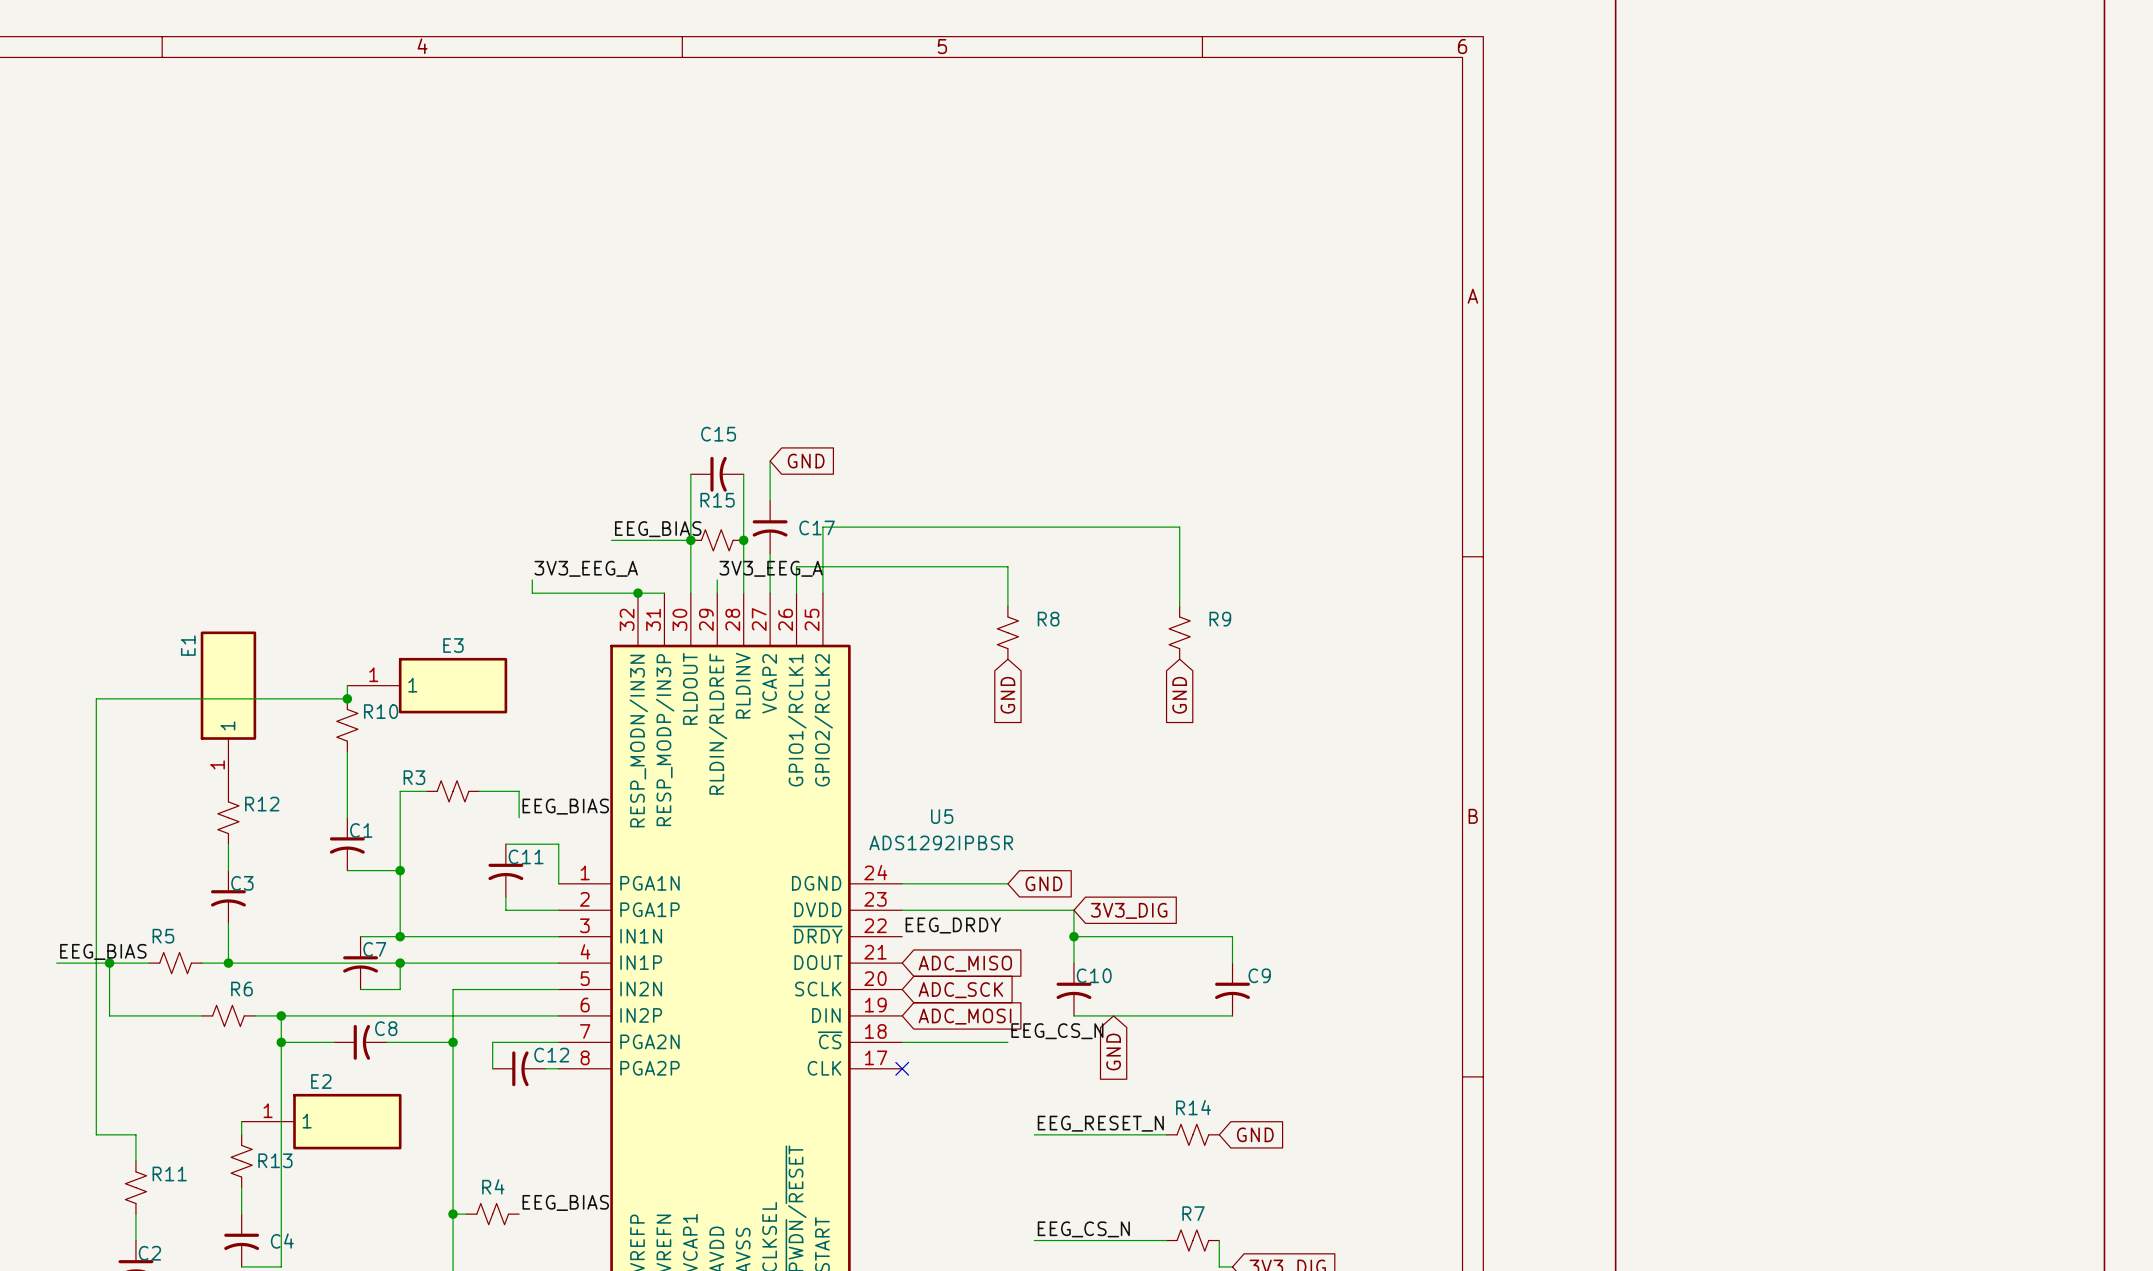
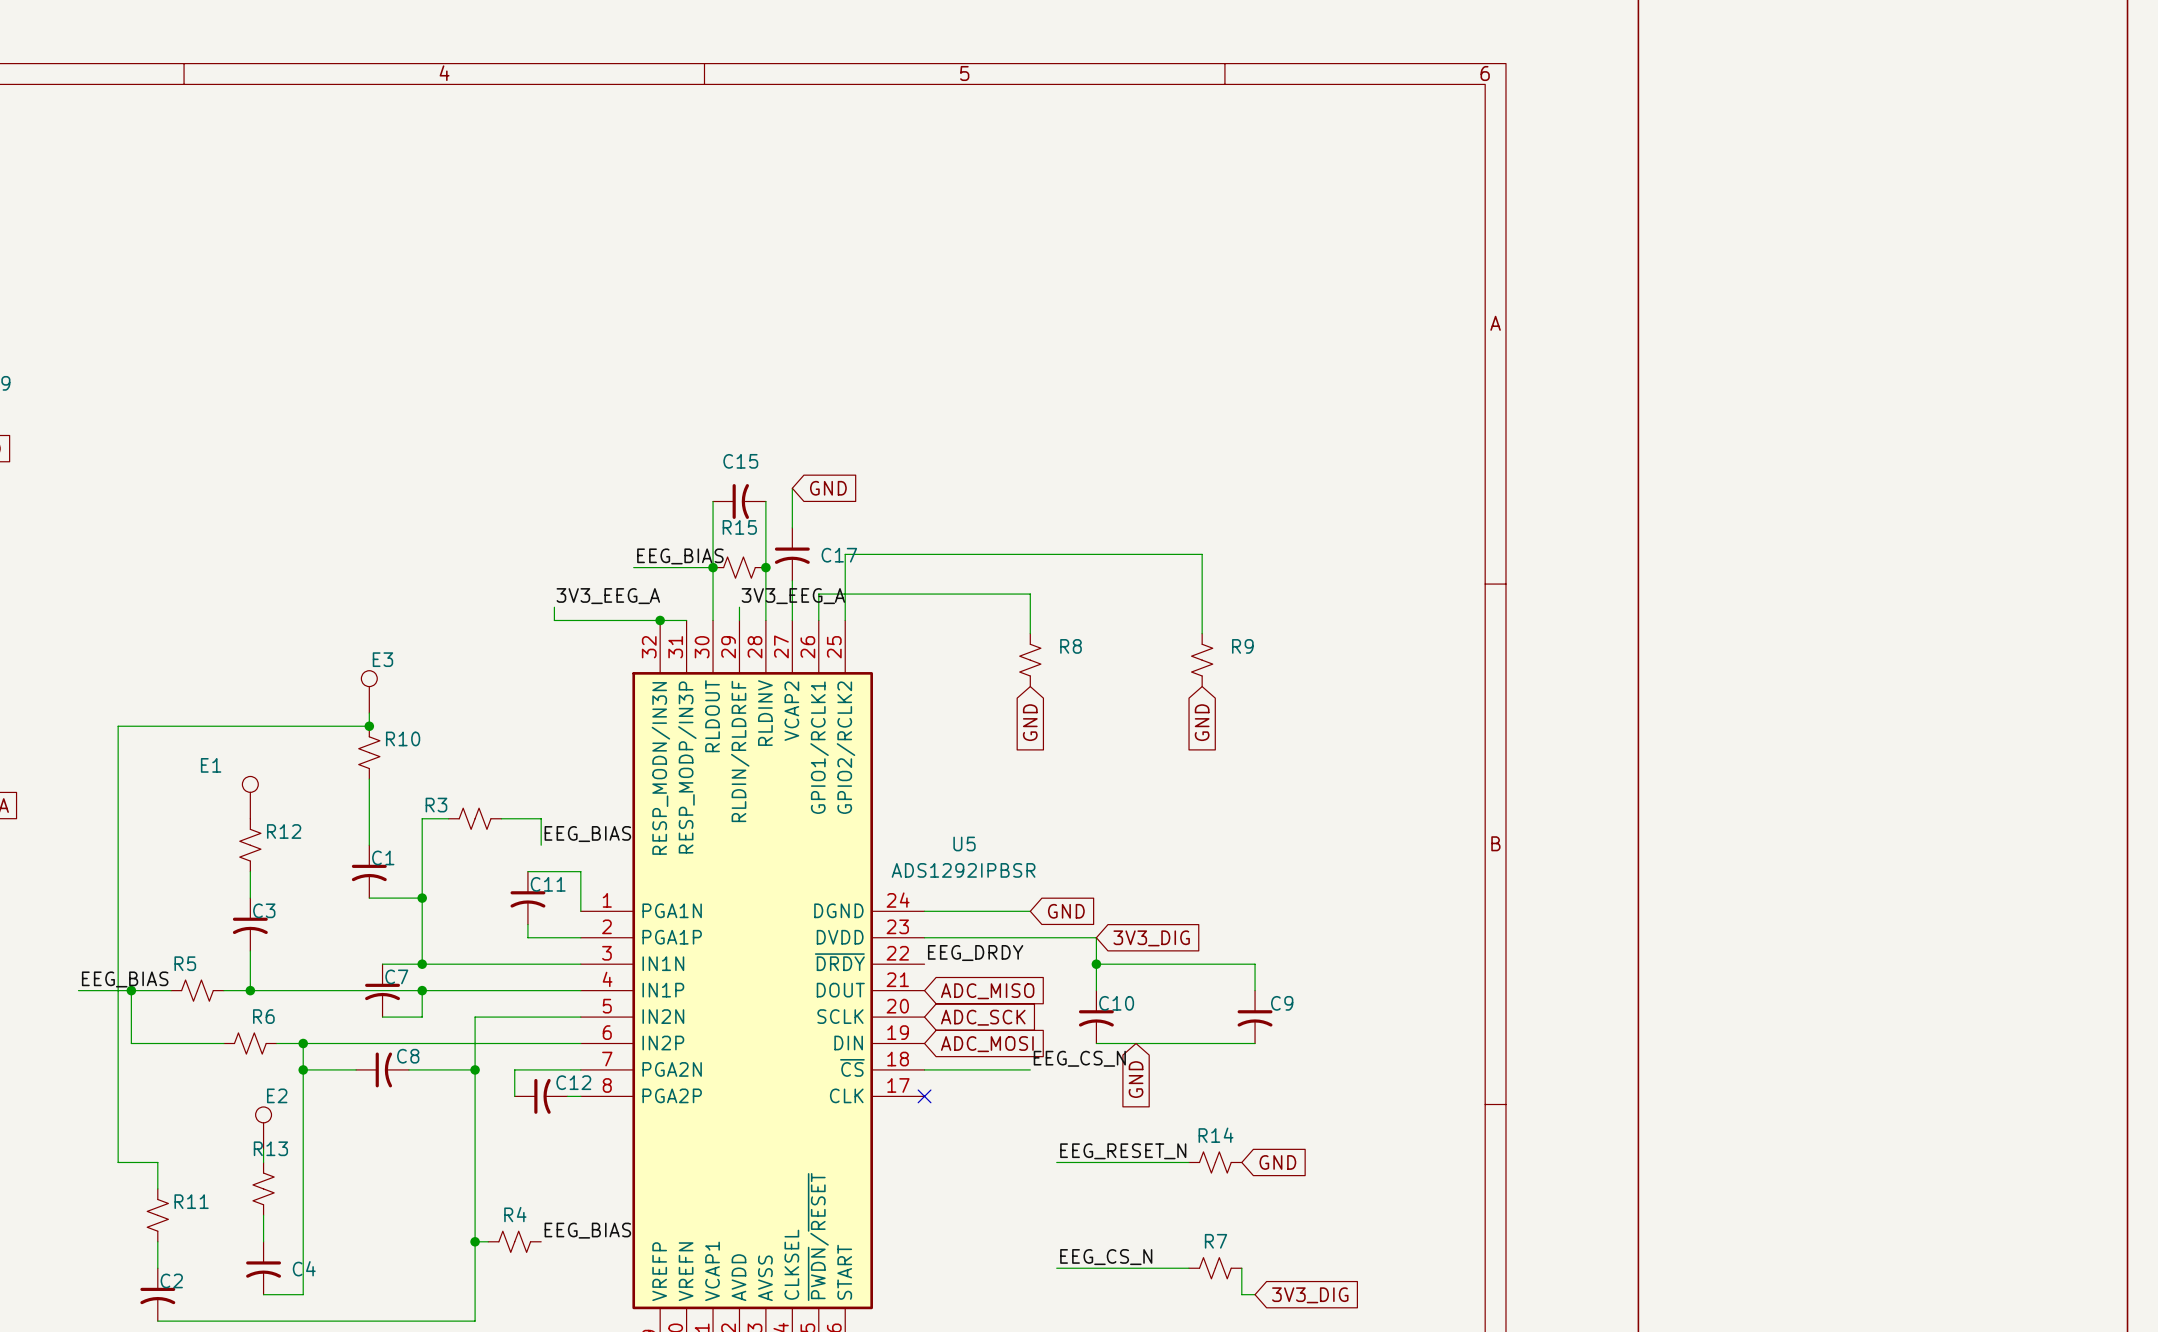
E1 symbol: [200, 631, 257, 792] -> [242, 776, 259, 819]
E1 name position: E1 (188, 645) -> E1 (211, 765)
E3 symbol: [347, 657, 508, 714] -> [361, 670, 378, 714]
E2 symbol: [241, 1093, 402, 1150] -> [255, 1106, 272, 1150]
R13 name position: R13 (275, 1160) -> R13 (270, 1148)

